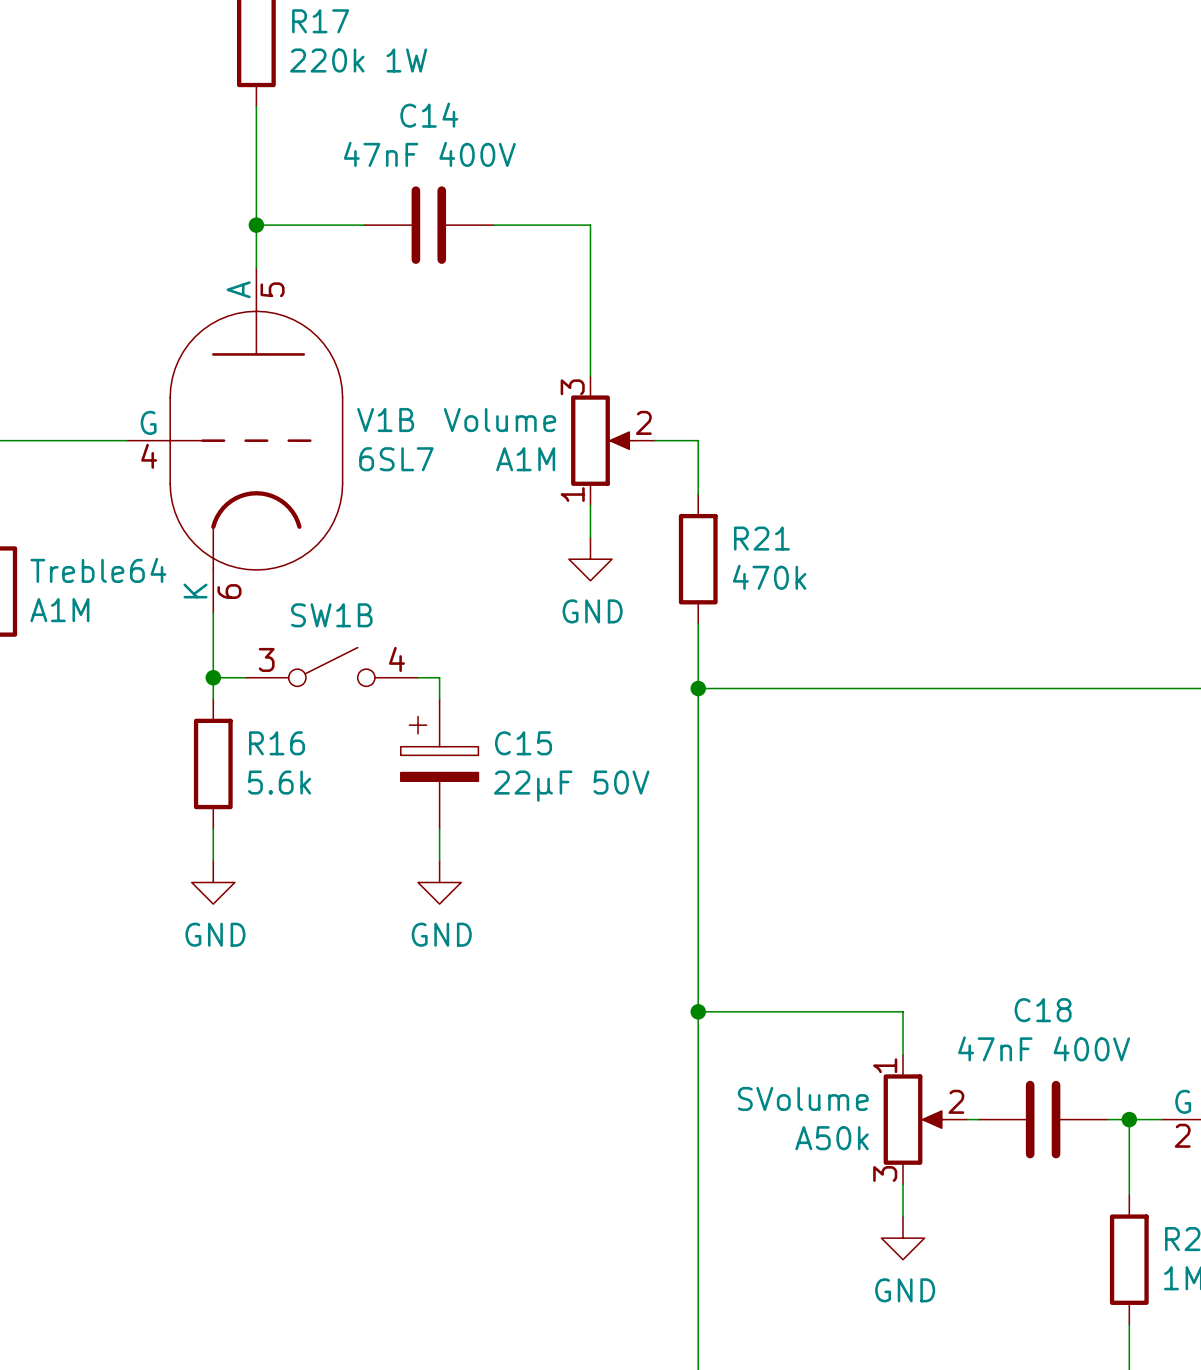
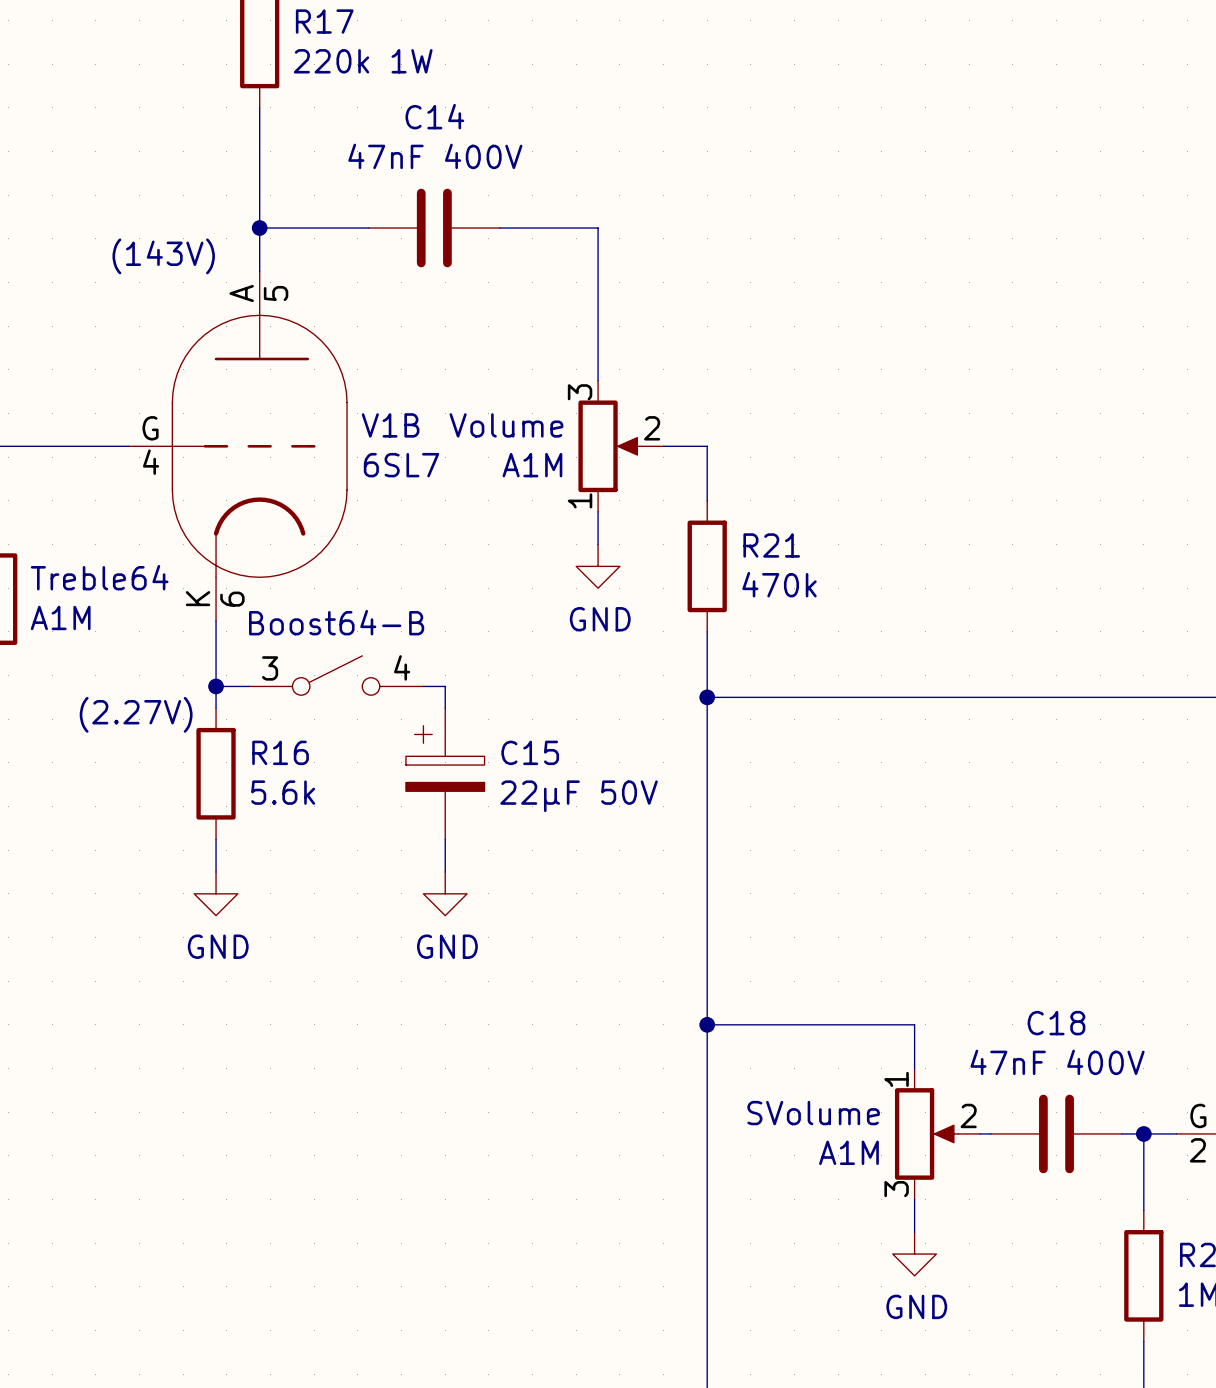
text: none -> (143V) (163, 256)
SW1B name: SW1B (331, 615) -> Boost64-B (336, 622)
text: none -> (2.27V) (136, 714)
SVolume value: A50k (832, 1138) -> A1M (848, 1152)

